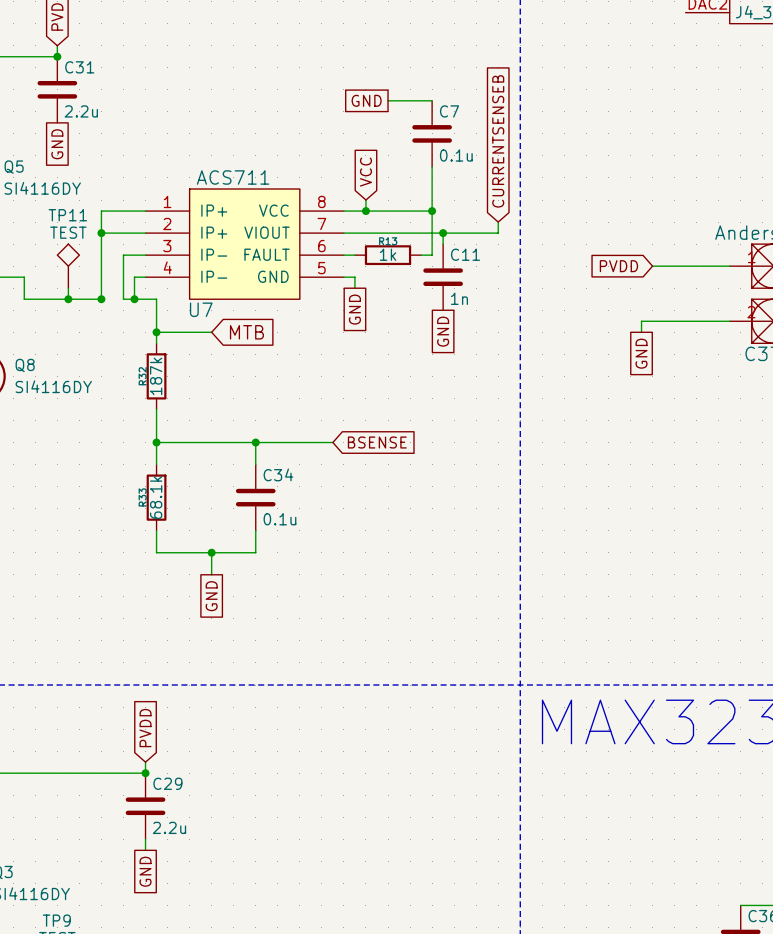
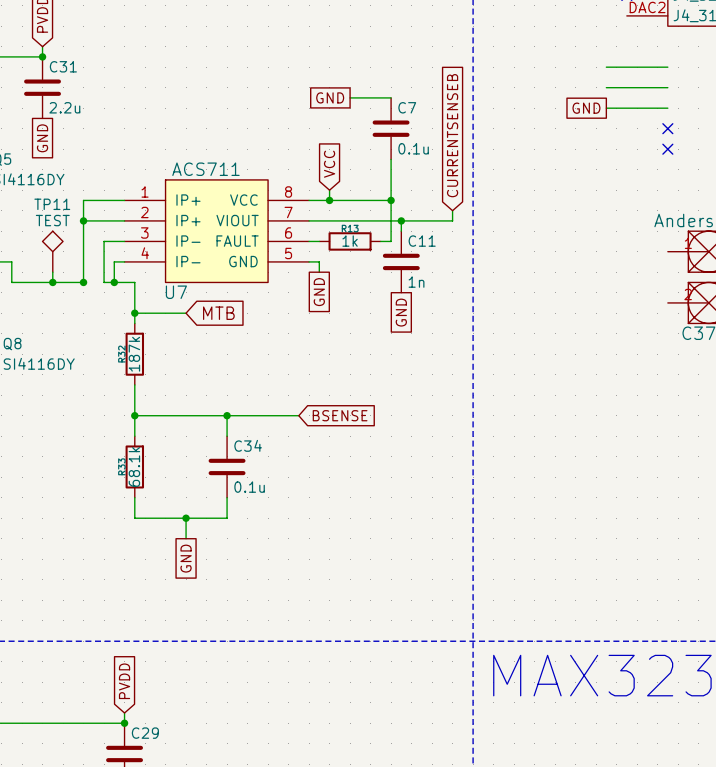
wire: none -> (606, 67) (667, 67)
wire: none -> (606, 87) (667, 87)
global label: none -> GND (586, 108)
wire: none -> (606, 108) (667, 108)
no-connect mark: none -> (667, 128)
no-connect mark: none -> (667, 149)
global label: PVDD (618, 266) -> none
wire: (652, 266) (729, 266) -> none
wire: (729, 321) (641, 321) (641, 332) -> none
global label: GND (641, 353) -> none

